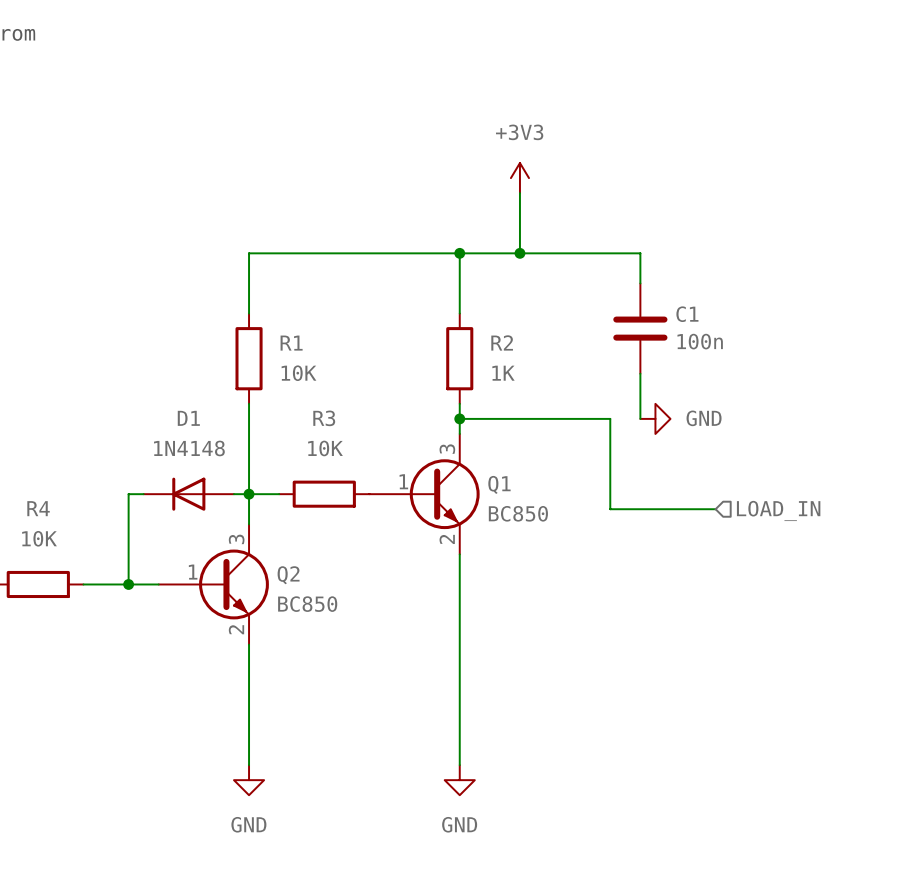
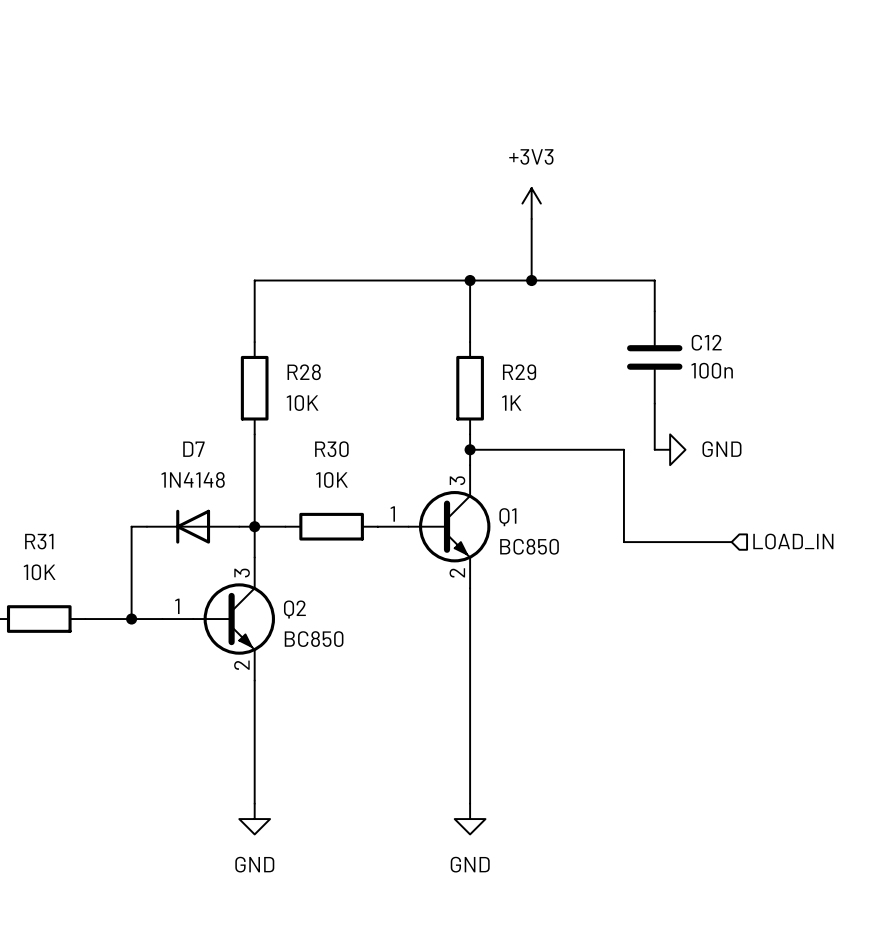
C1 name: C1 (687, 314) -> C12 (706, 342)
R2 name: R2 (502, 342) -> R29 (519, 372)
R1 name: R1 (291, 343) -> R28 (304, 372)
D1 name: D1 (188, 418) -> D7 (193, 449)
R3 name: R3 (324, 418) -> R30 (331, 449)
Q1 symbol: [369, 433, 480, 555] -> [377, 465, 491, 589]
R4 name: R4 (38, 508) -> R31 (39, 541)
Q2 symbol: [158, 524, 269, 645] -> [162, 557, 276, 681]

